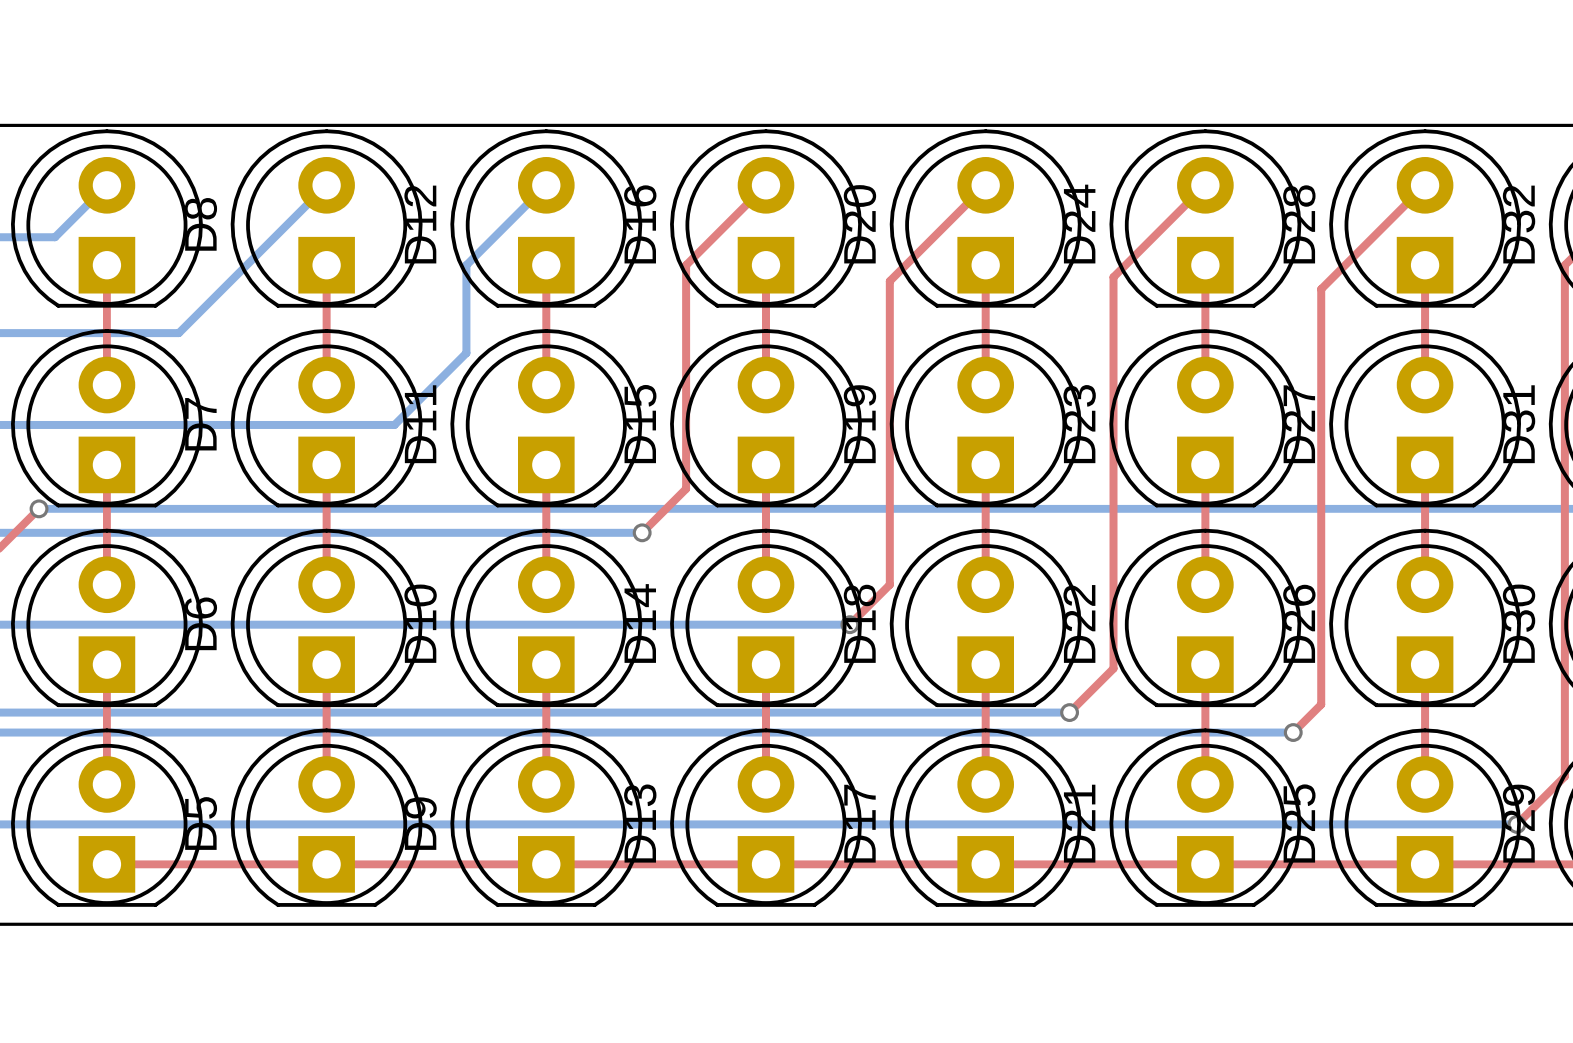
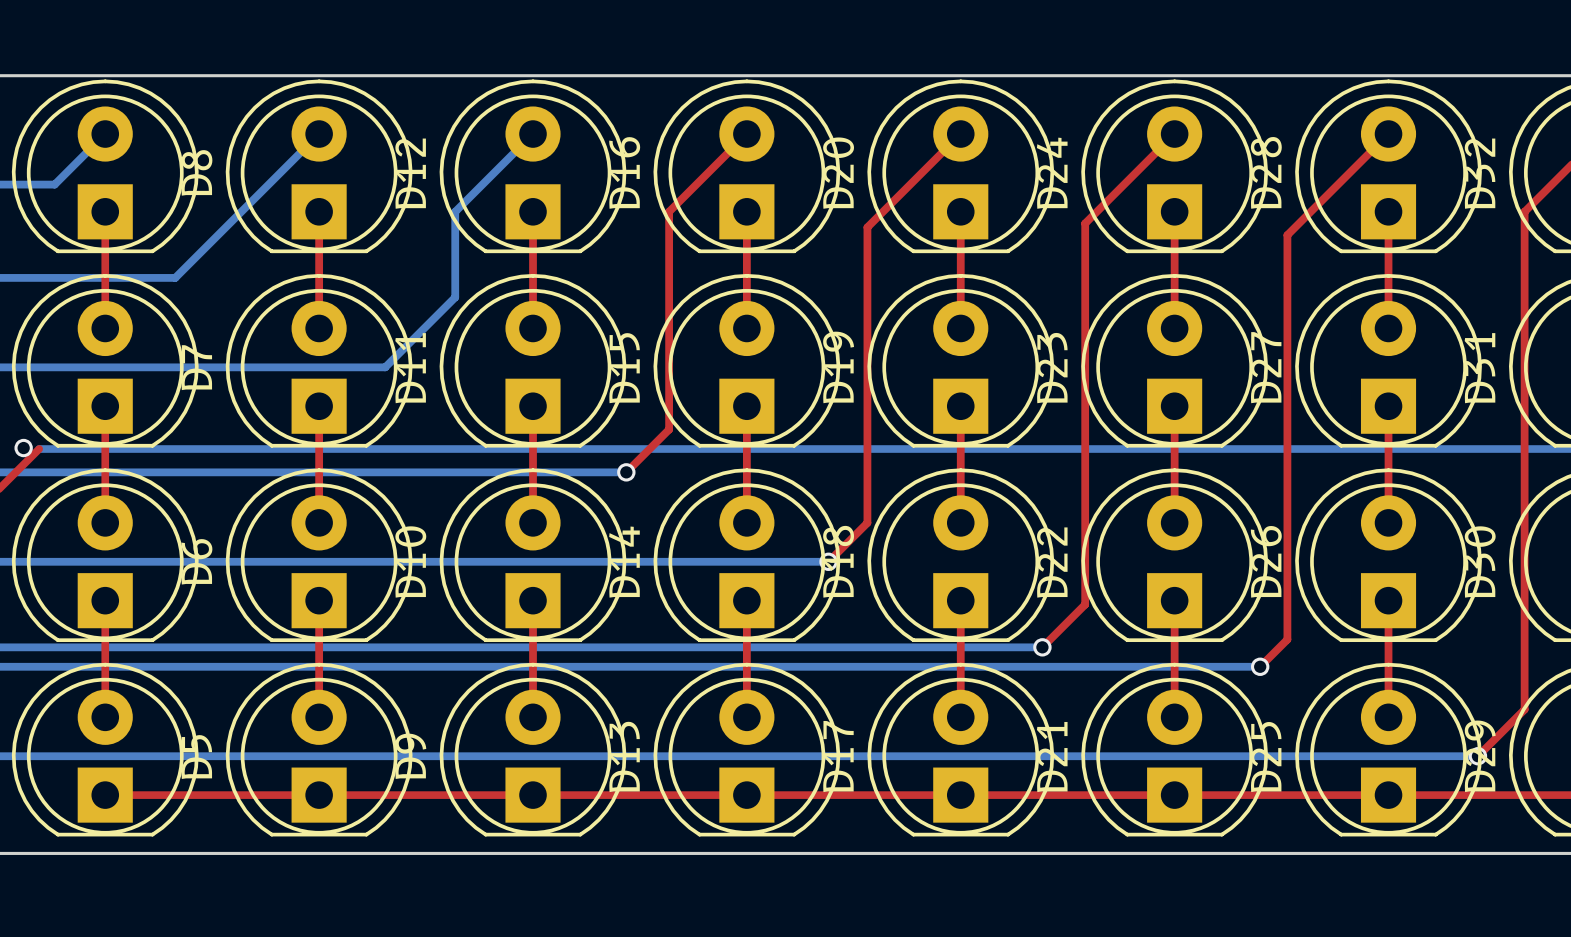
via position: (39, 508) -> (23, 448)

